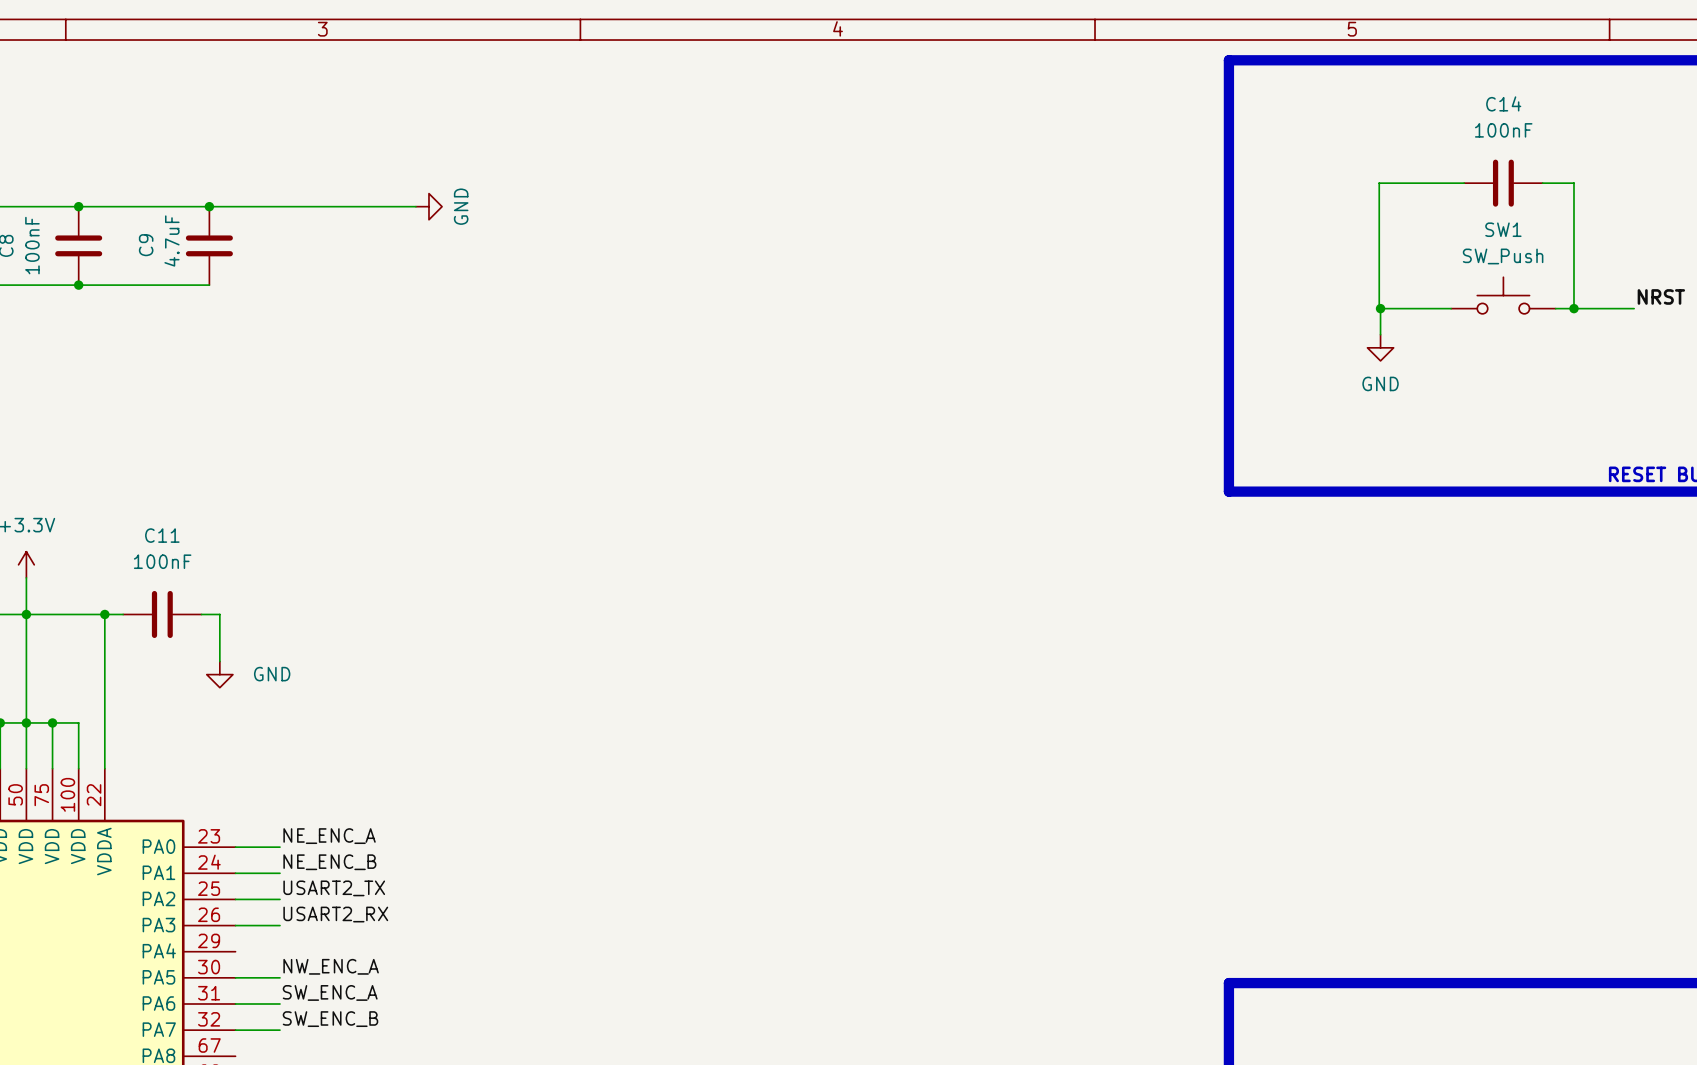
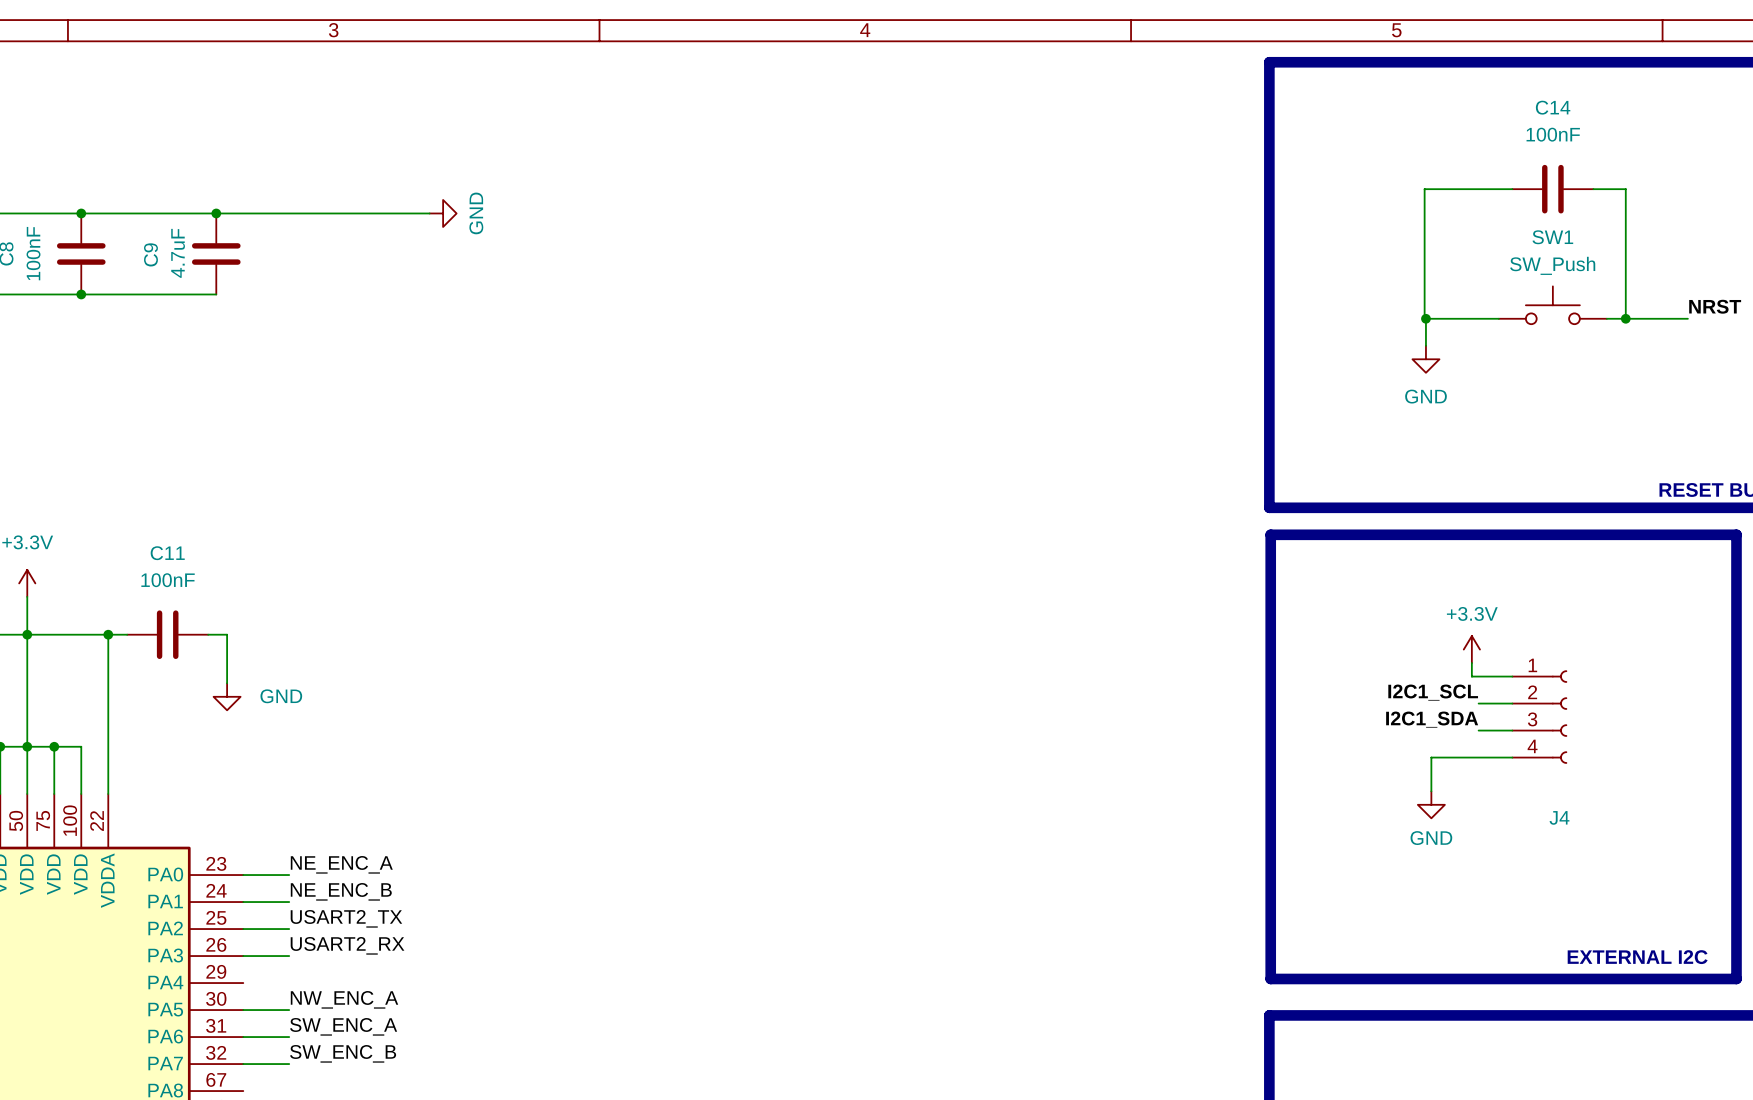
line: none -> (1270, 534) (1736, 534) (1736, 978) (1270, 978) (1270, 534)
power symbol: none -> +3.3V (1471, 649)
wire: none -> (1471, 663) (1471, 676) (1512, 676)
label: none -> I2C1_SCL (1433, 692)
wire: none -> (1478, 703) (1512, 703)
J4: none -> (1539, 717)
label: none -> I2C1_SDA (1432, 719)
wire: none -> (1478, 730) (1512, 730)
wire: none -> (1512, 757) (1431, 757) (1431, 791)
power symbol: none -> GND (1431, 804)
text: none -> EXTERNAL I2C (1637, 957)

